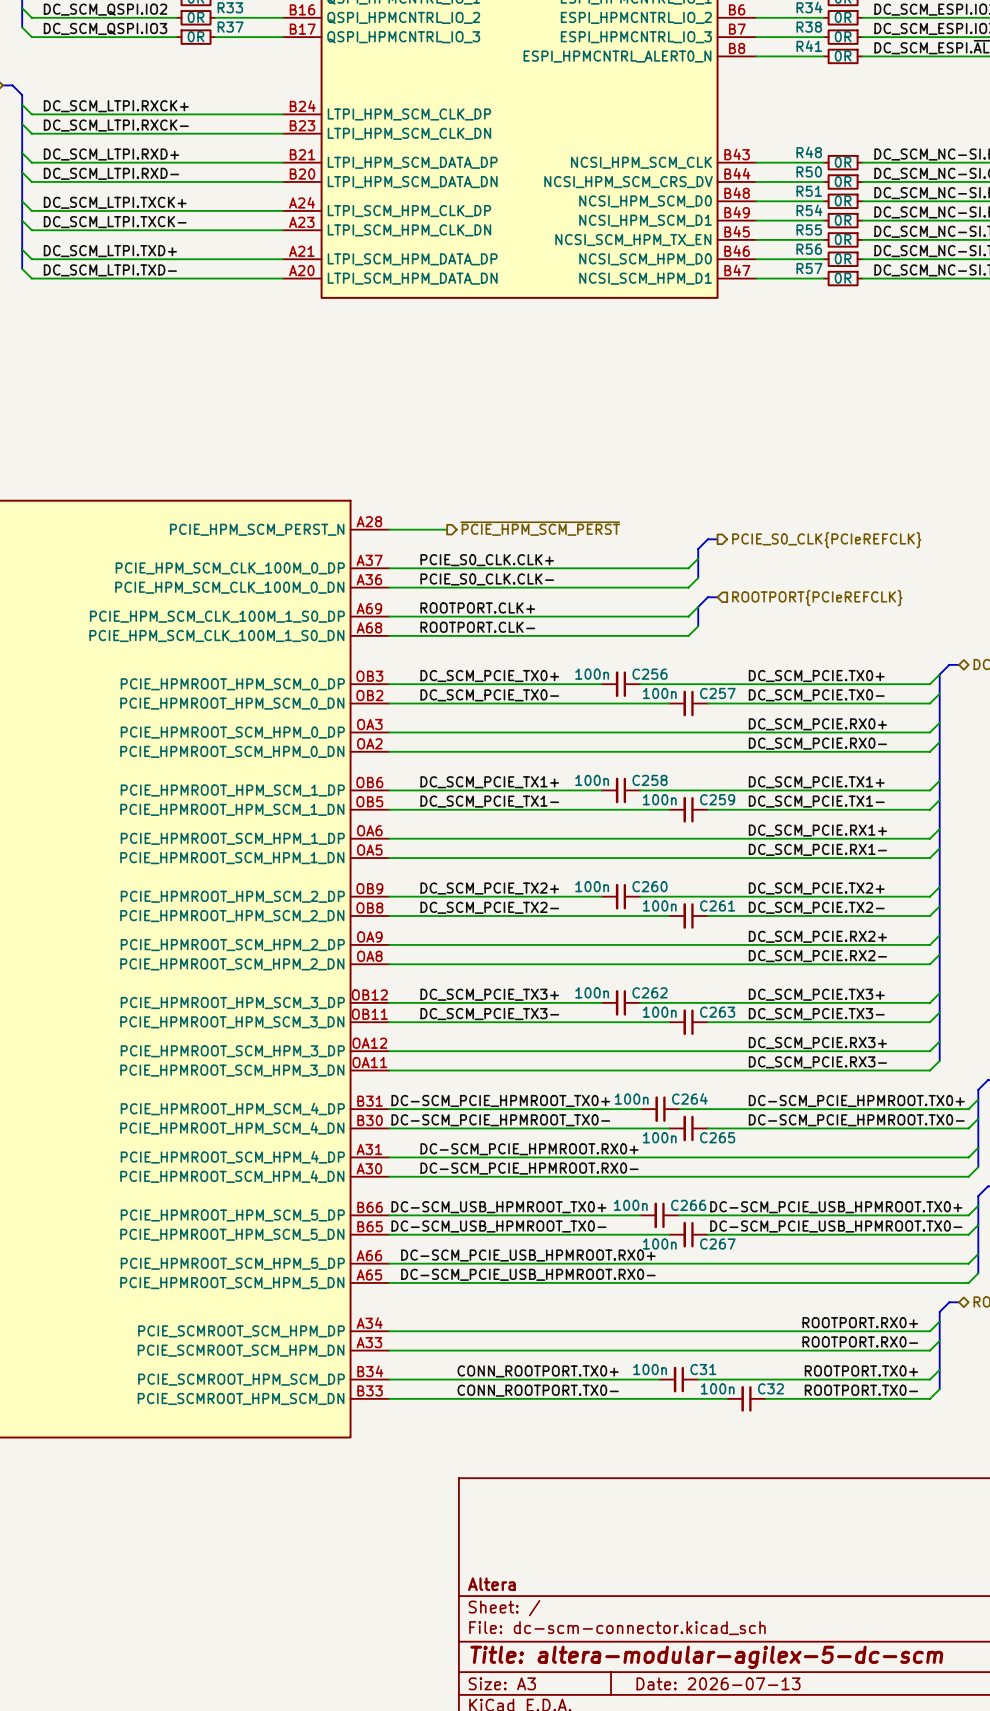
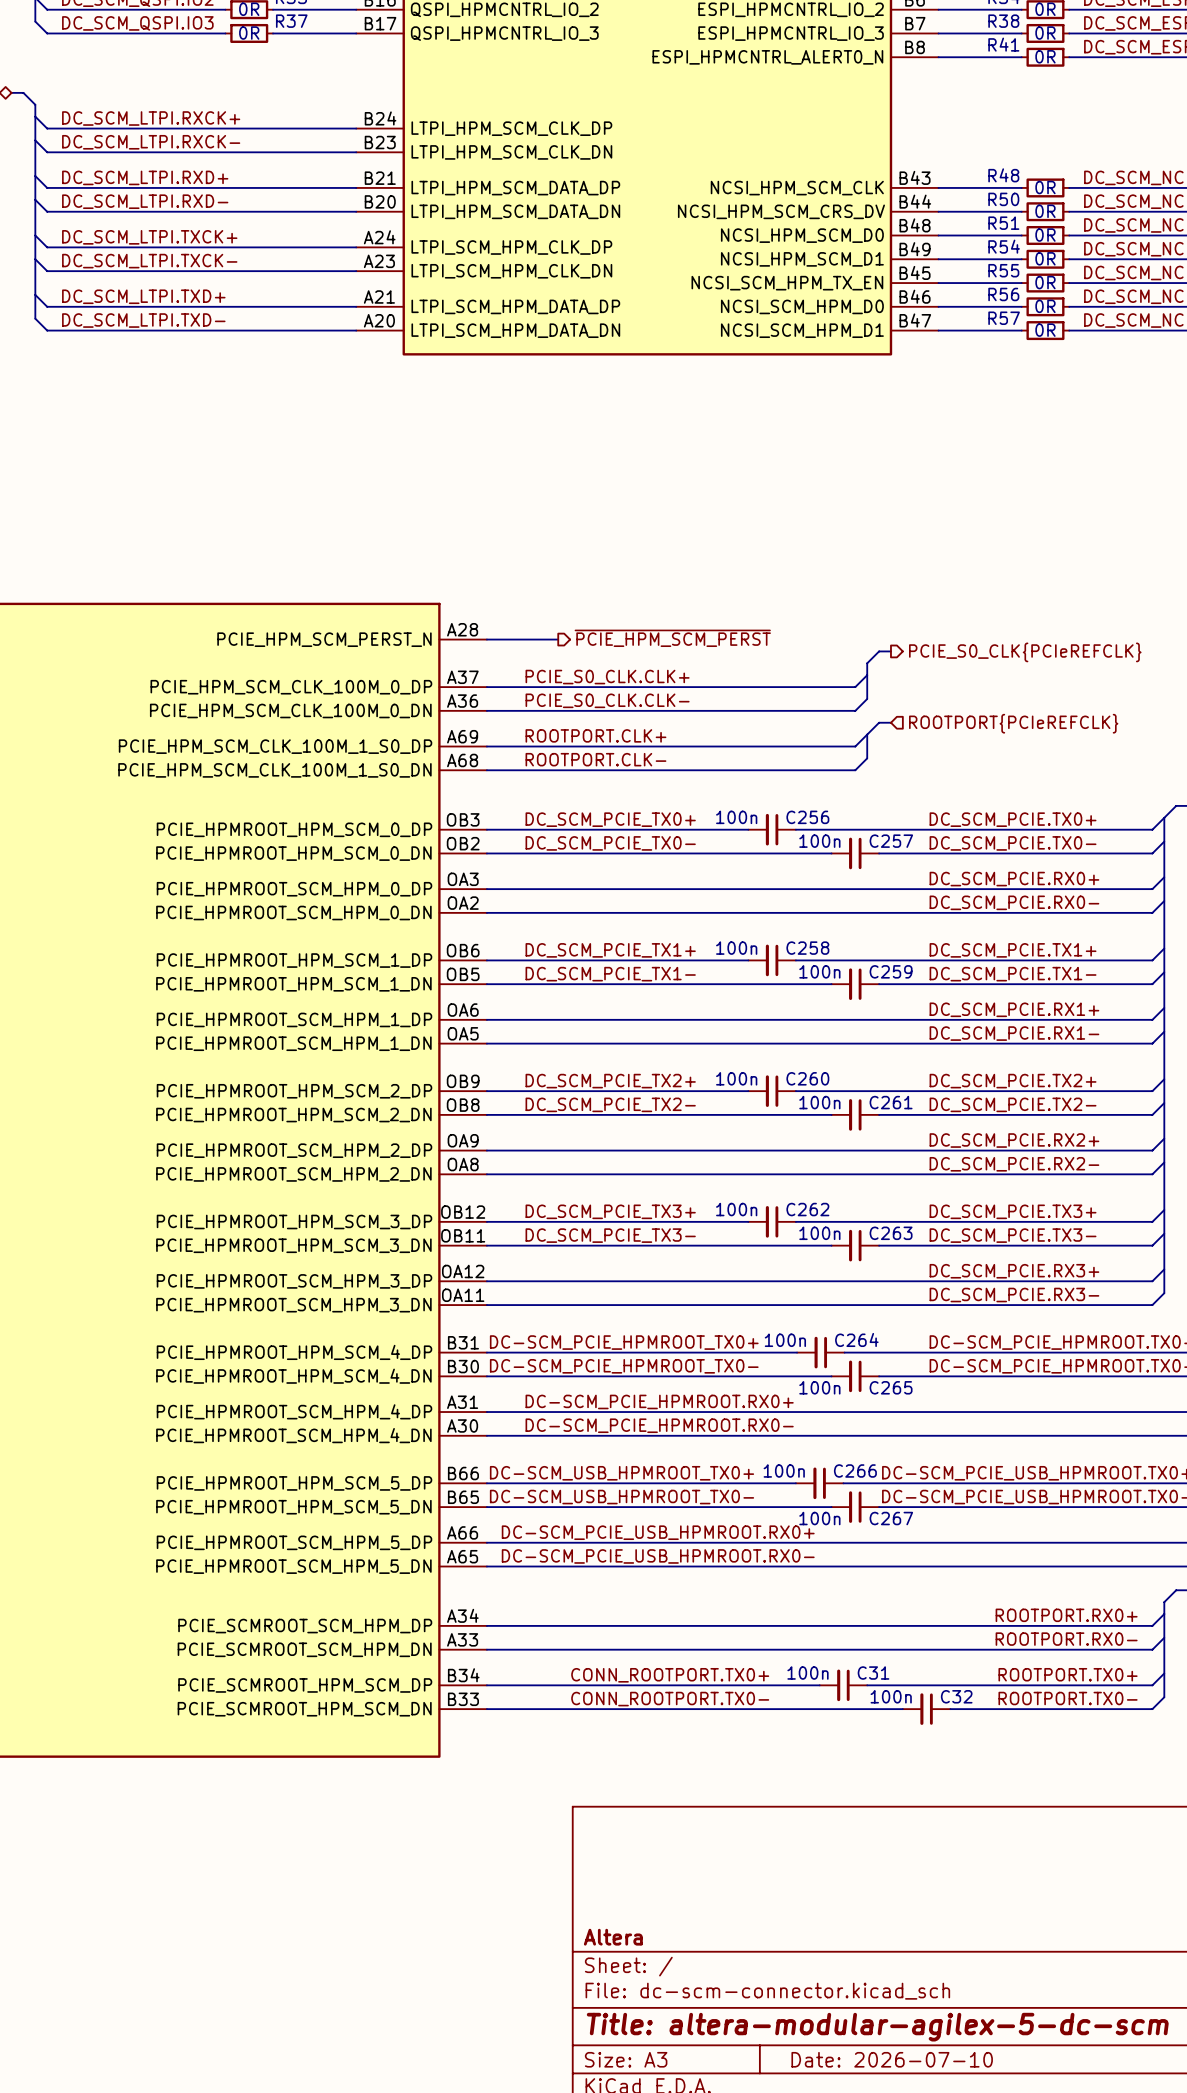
title block: Date: 2026-07-13 (718, 1683) -> Date: 2026-07-10 (892, 2059)

